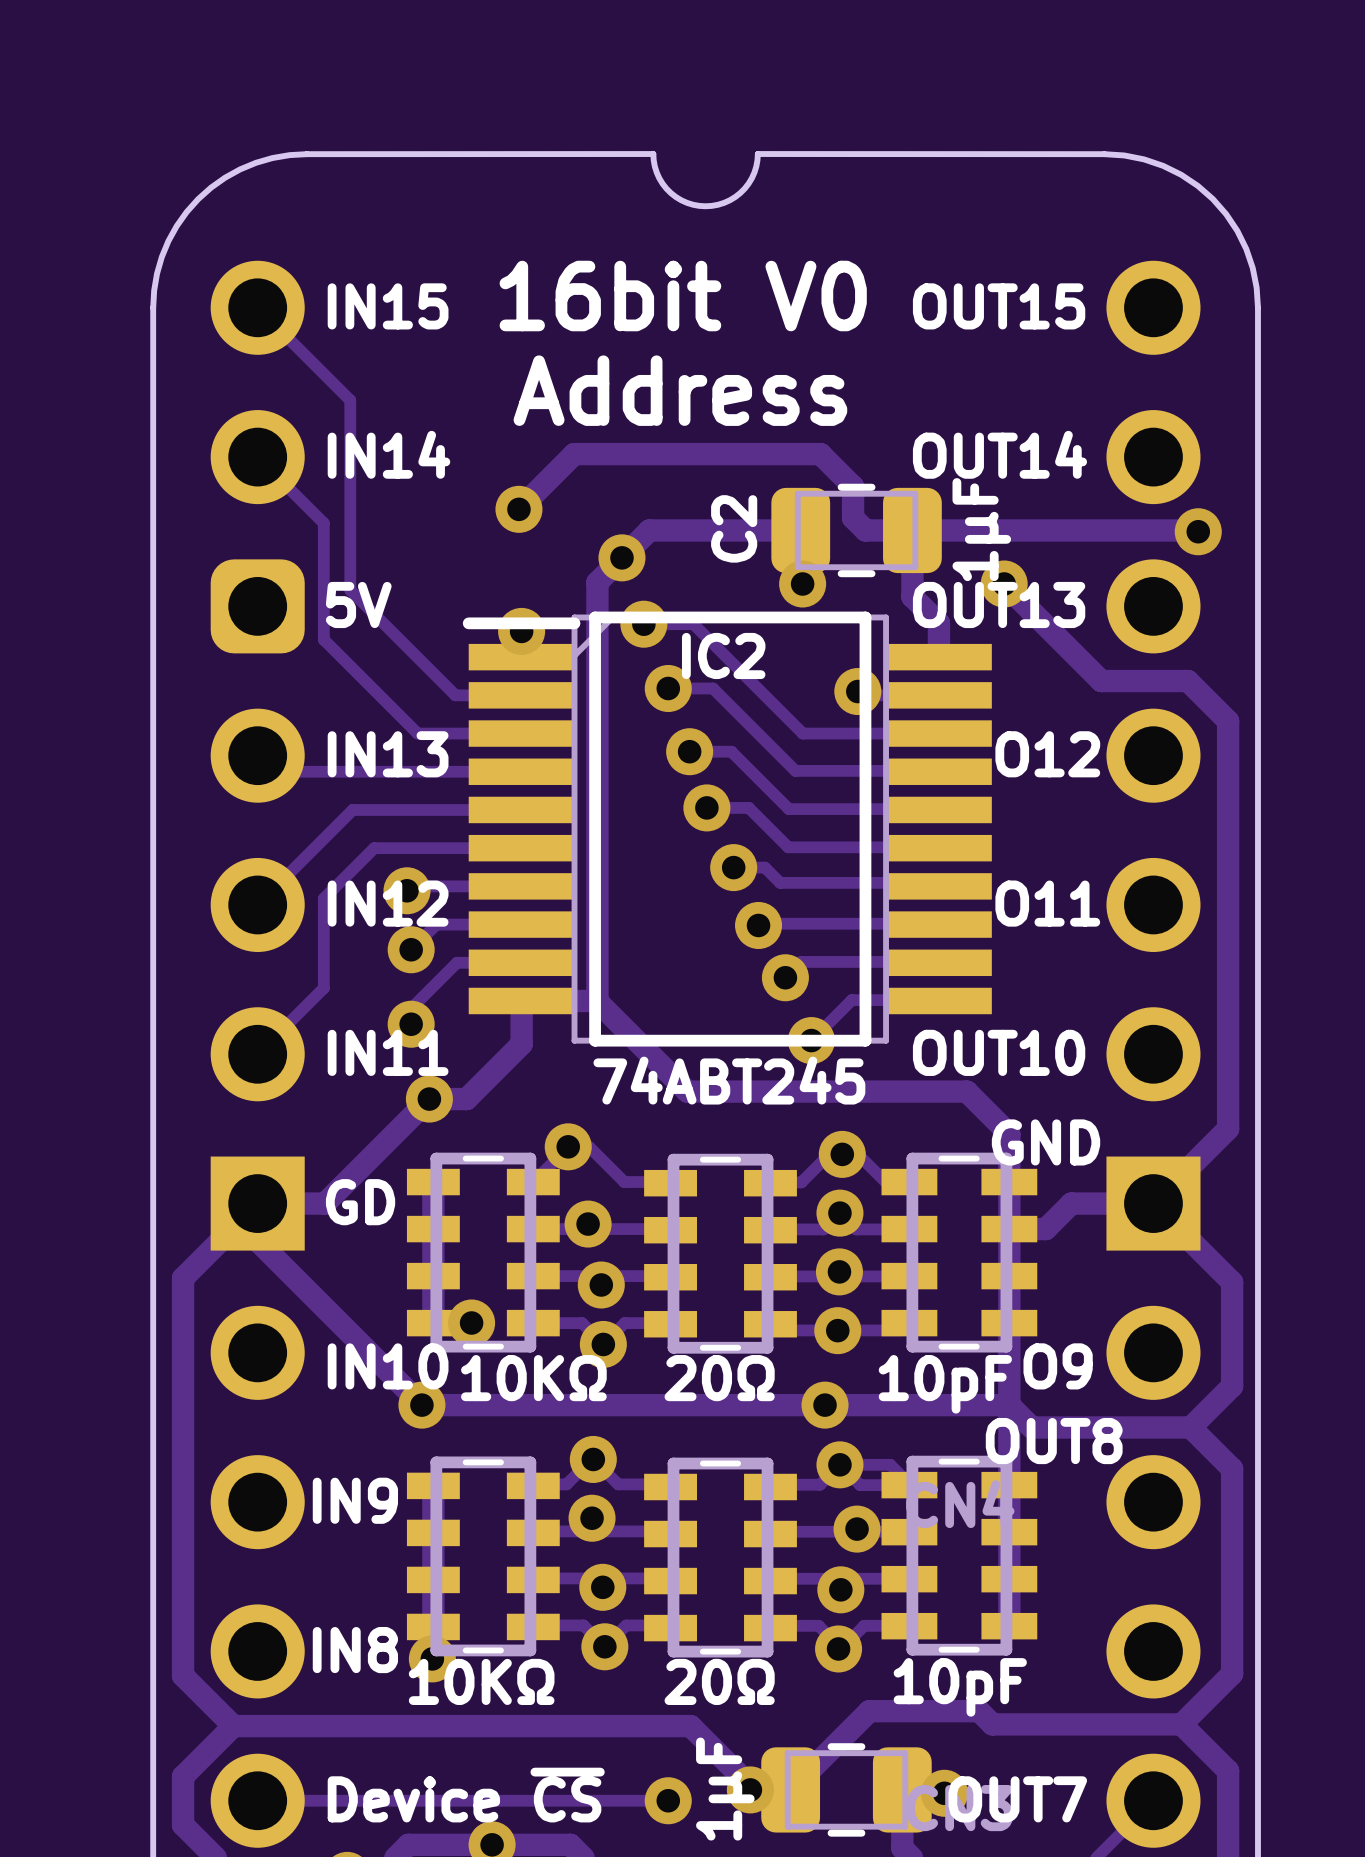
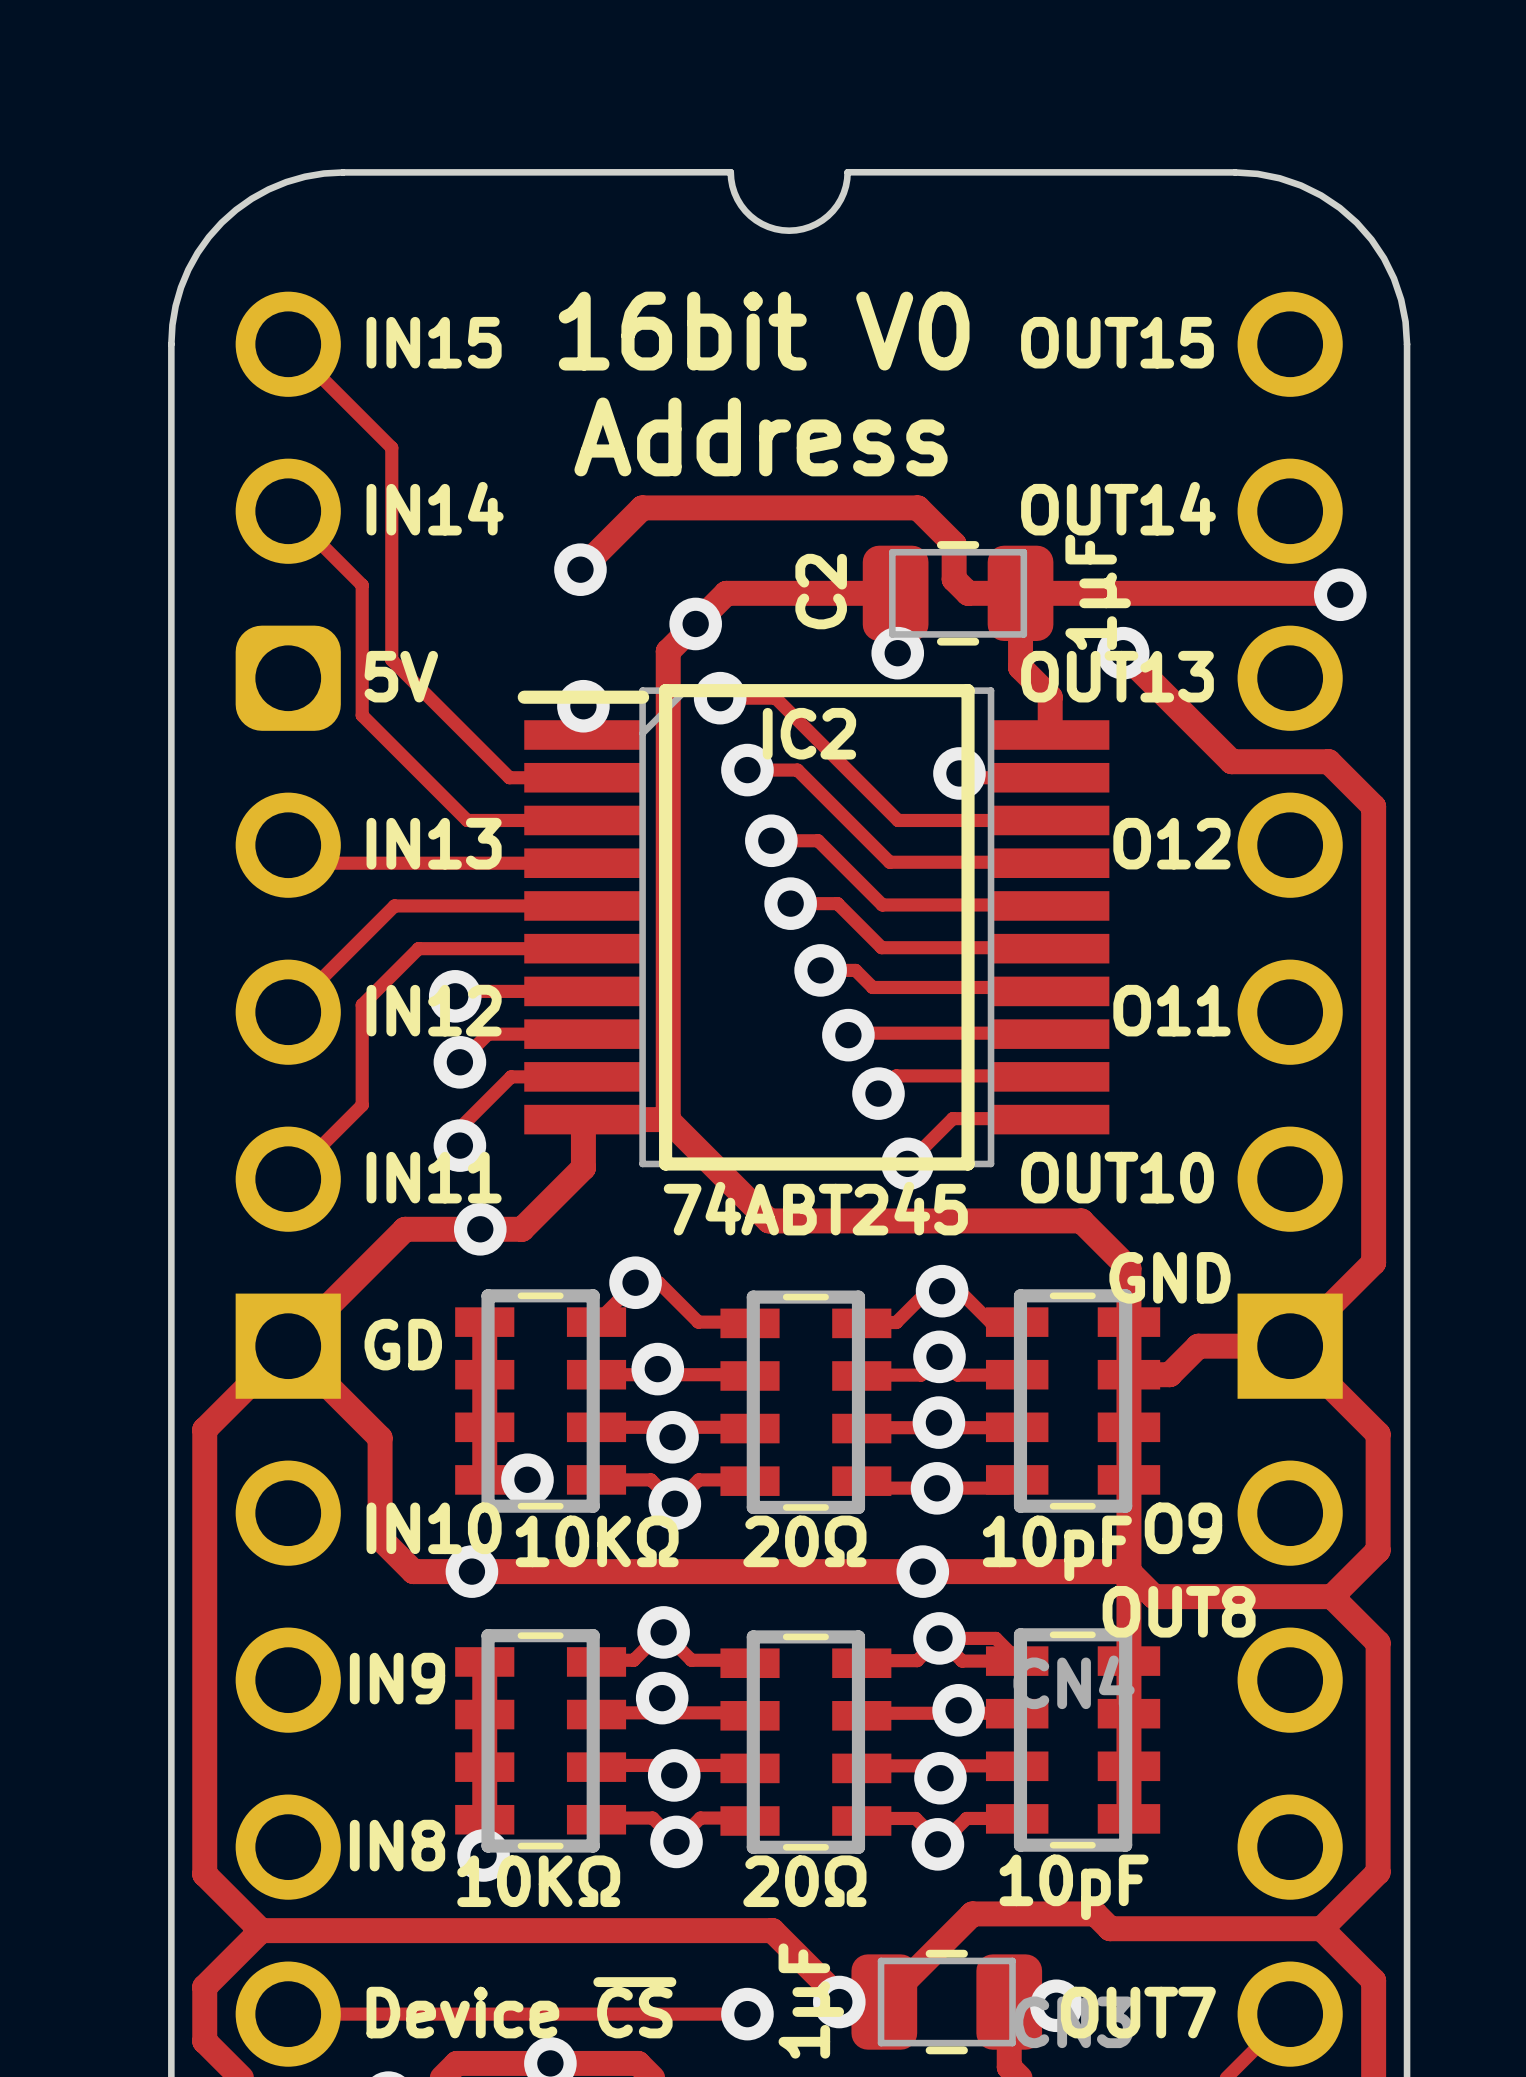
track: (429, 1099) (324, 1203) (257, 1203) (257, 1240) (421, 1405) -> (480, 1229) (405, 1229) (288, 1346) (380, 1438) (380, 1538) (413, 1571) (471, 1571)

